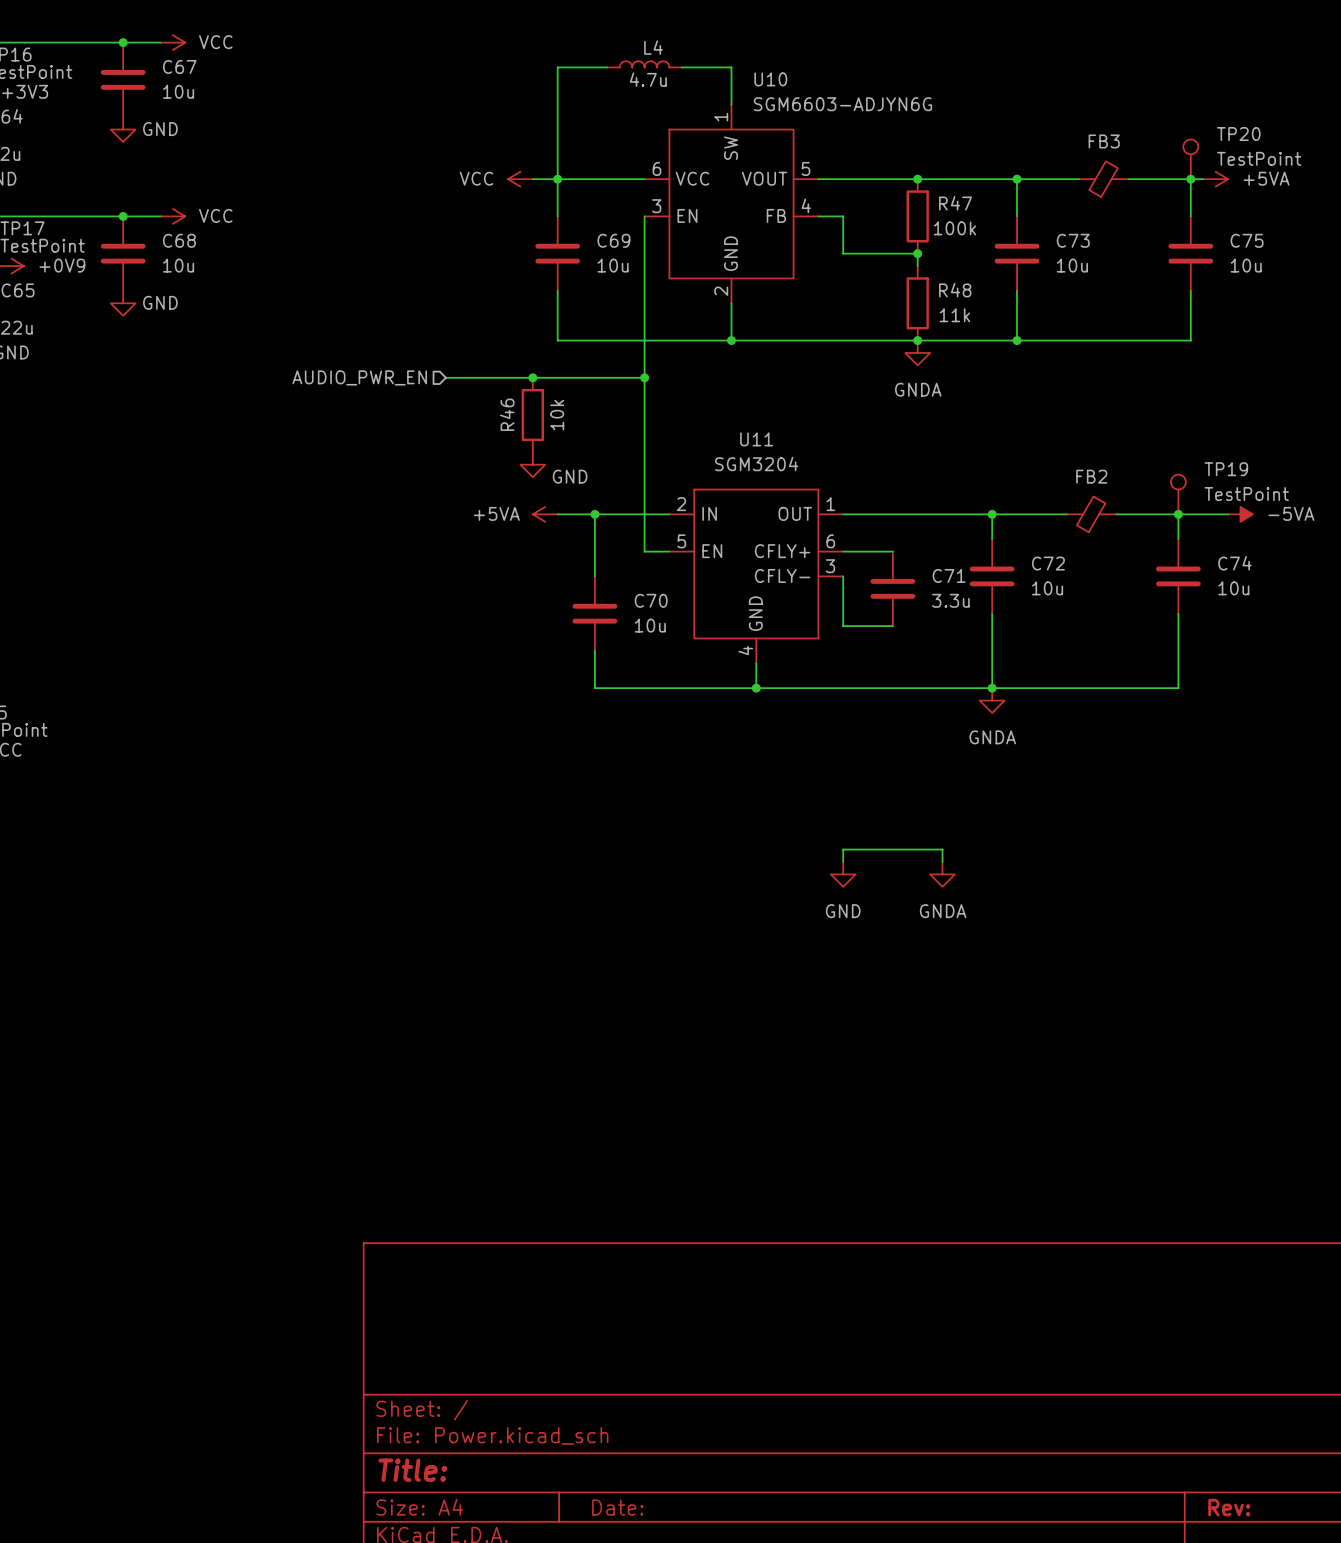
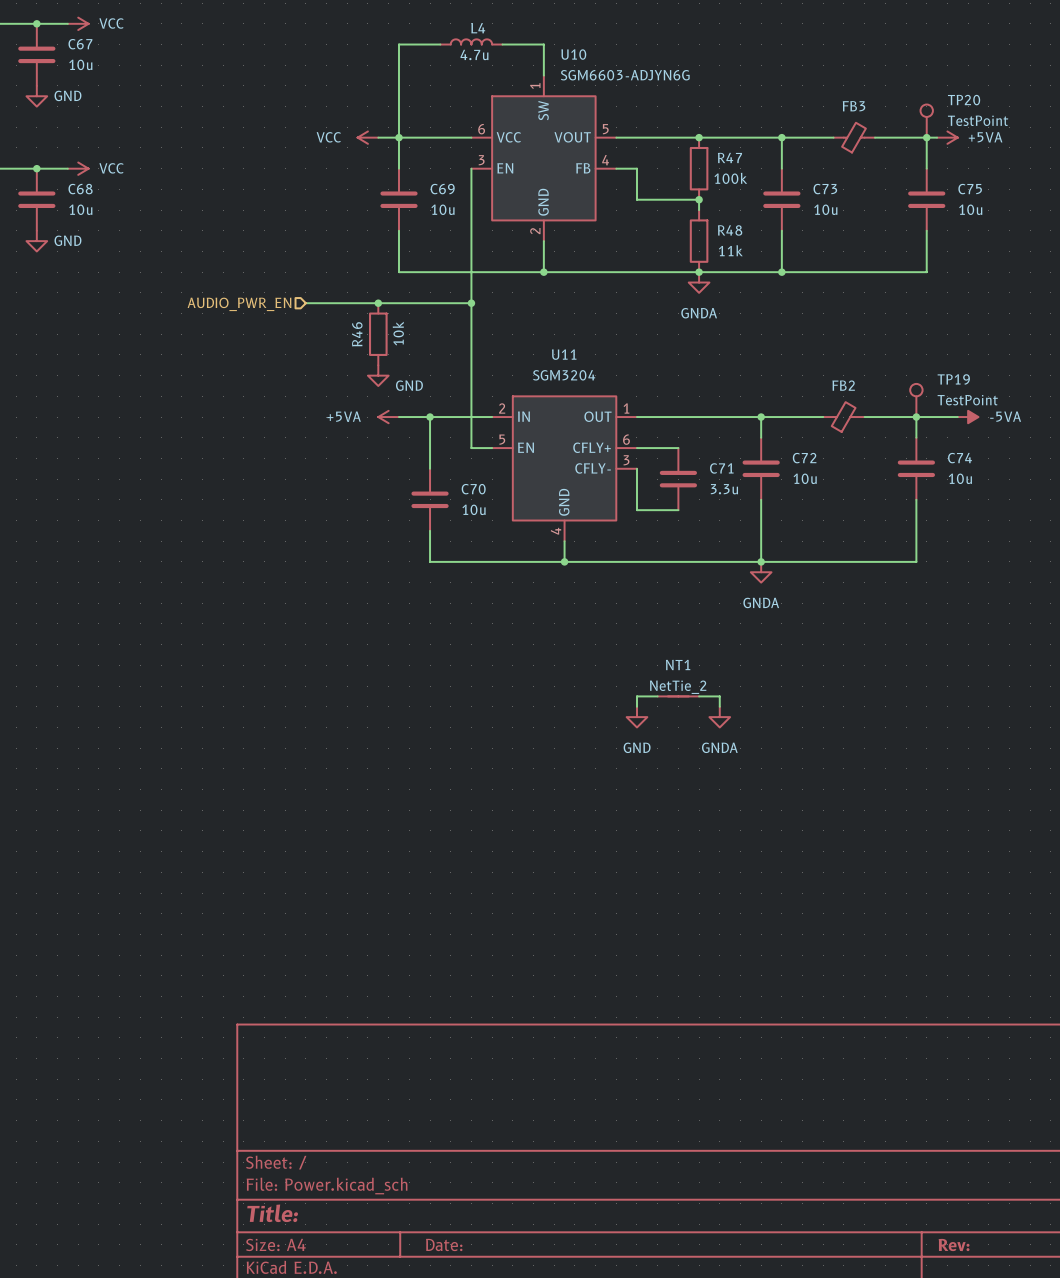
NT1: none -> NetTie_2 (678, 696)

